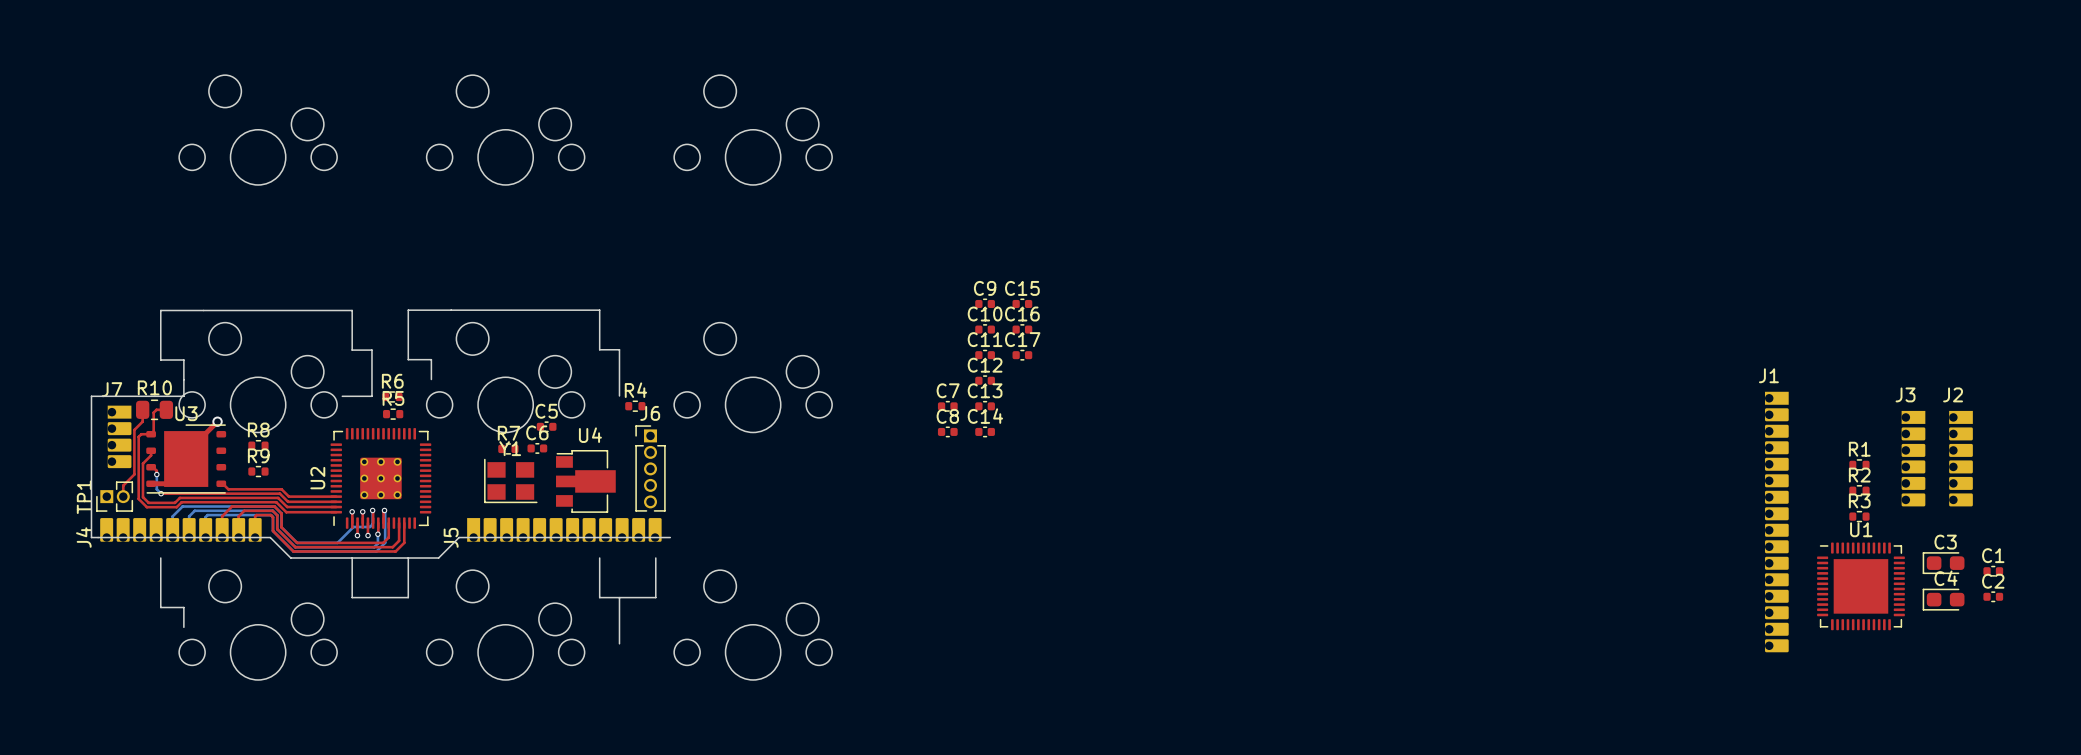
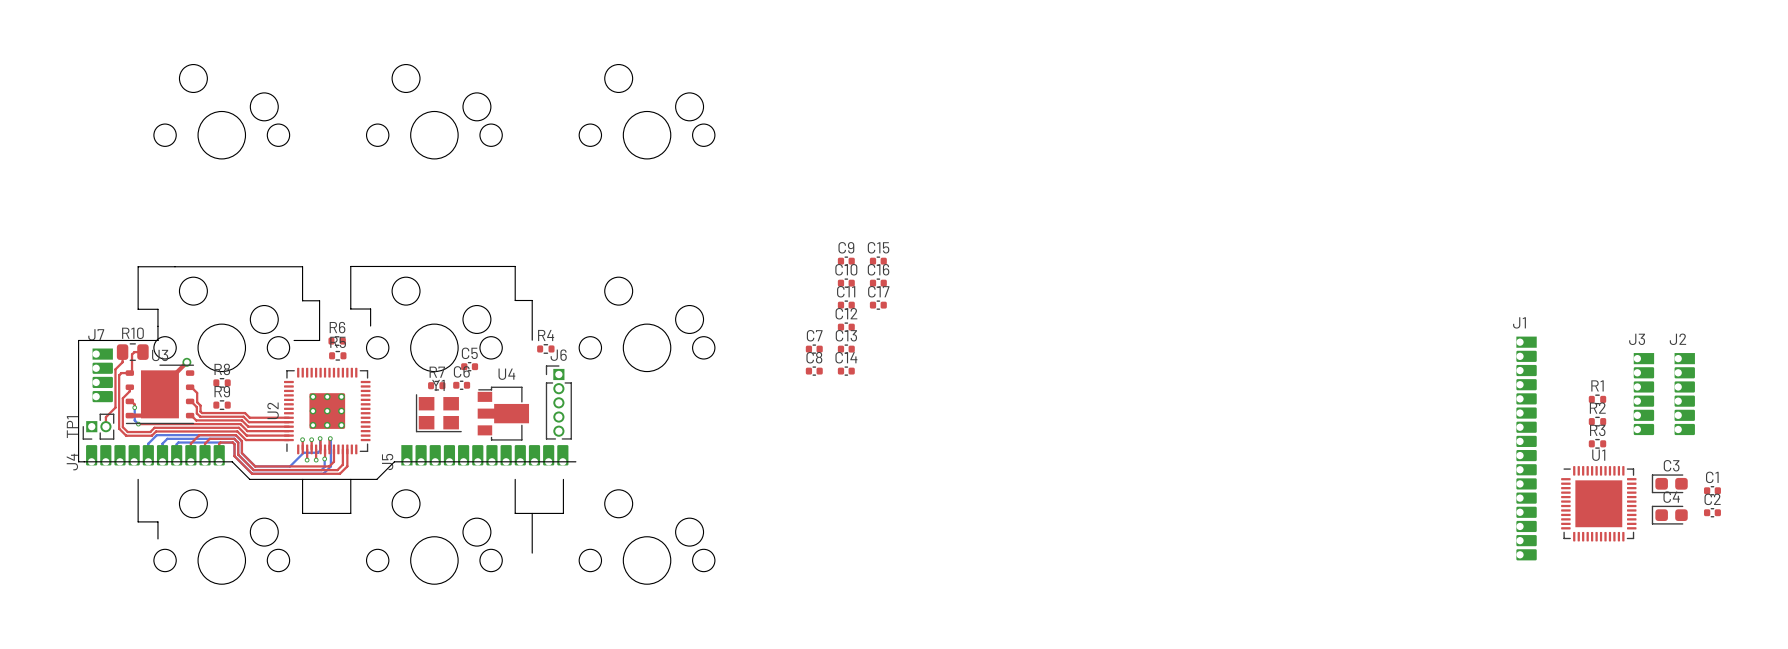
top track: none -> (190, 387) (197, 392) (197, 402) (200, 405) (201, 413) (245, 413) (249, 417) (288, 417)
top track: none -> (190, 401) (196, 407) (196, 413) (200, 416) (243, 416) (248, 422) (288, 422)

